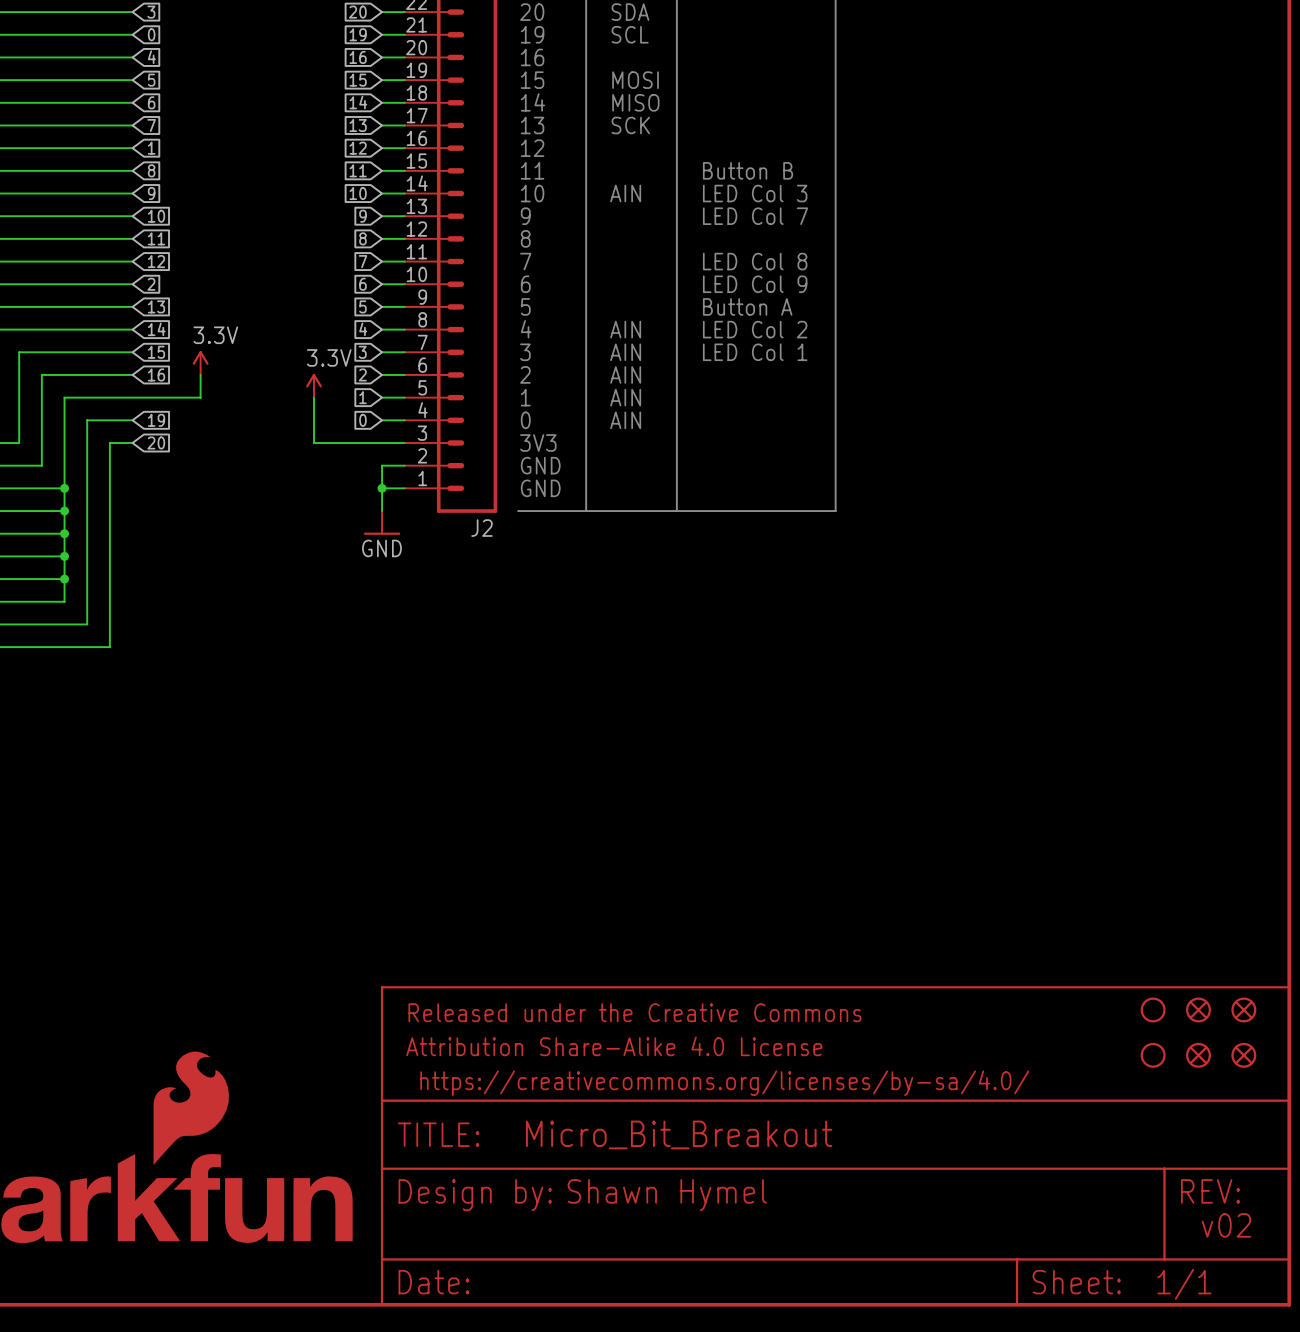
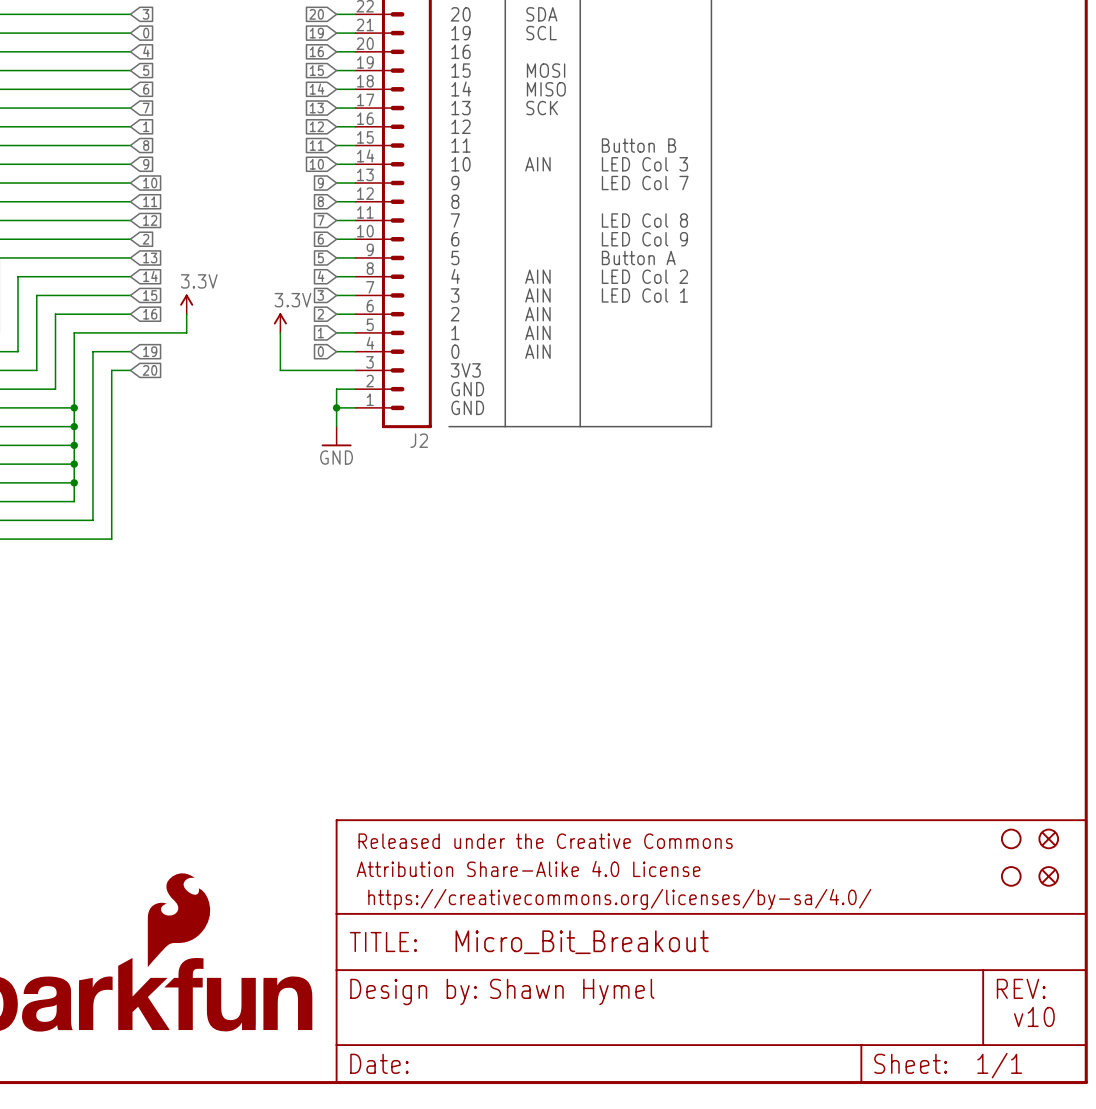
part symbol: [1186, 997, 1211, 1023] -> [1000, 828, 1022, 850]
part: (1153, 1009) -> none
part symbol: [1186, 1042, 1211, 1068] -> [1000, 866, 1022, 887]
part: (1153, 1055) -> none
text: v02 (1226, 1225) -> v10 (1034, 1016)

